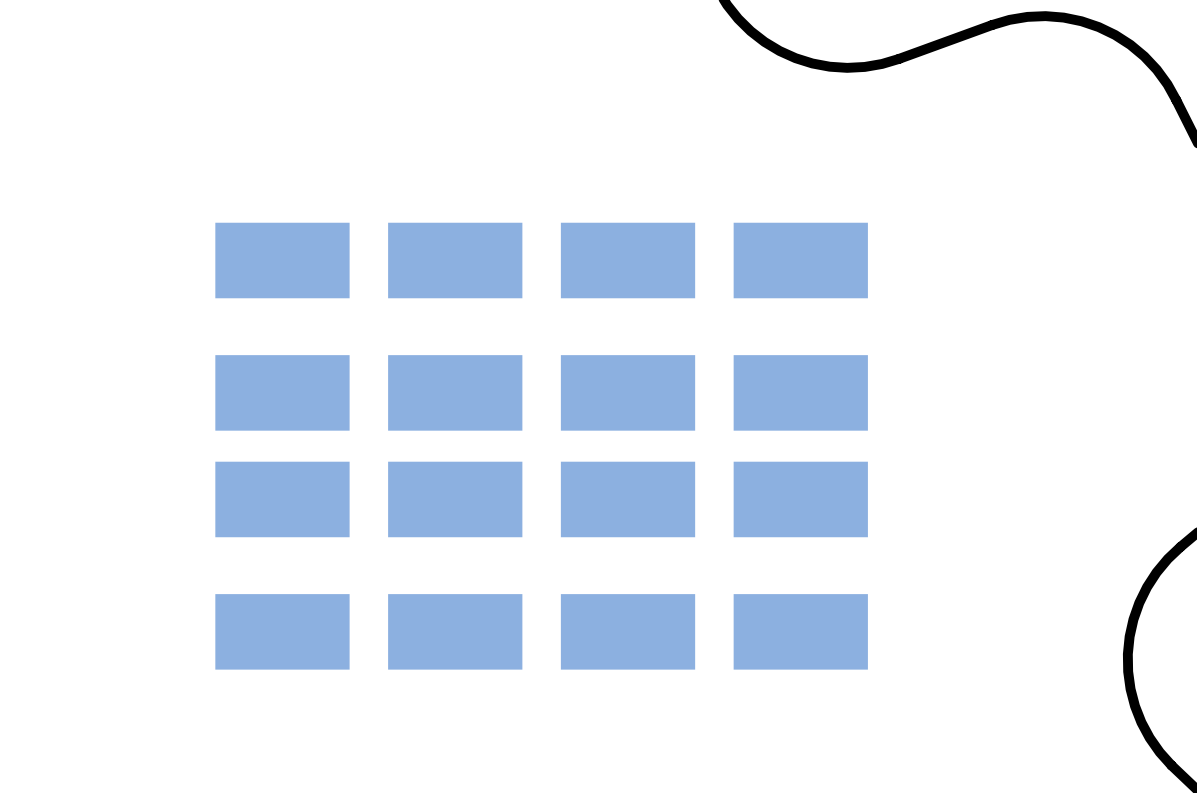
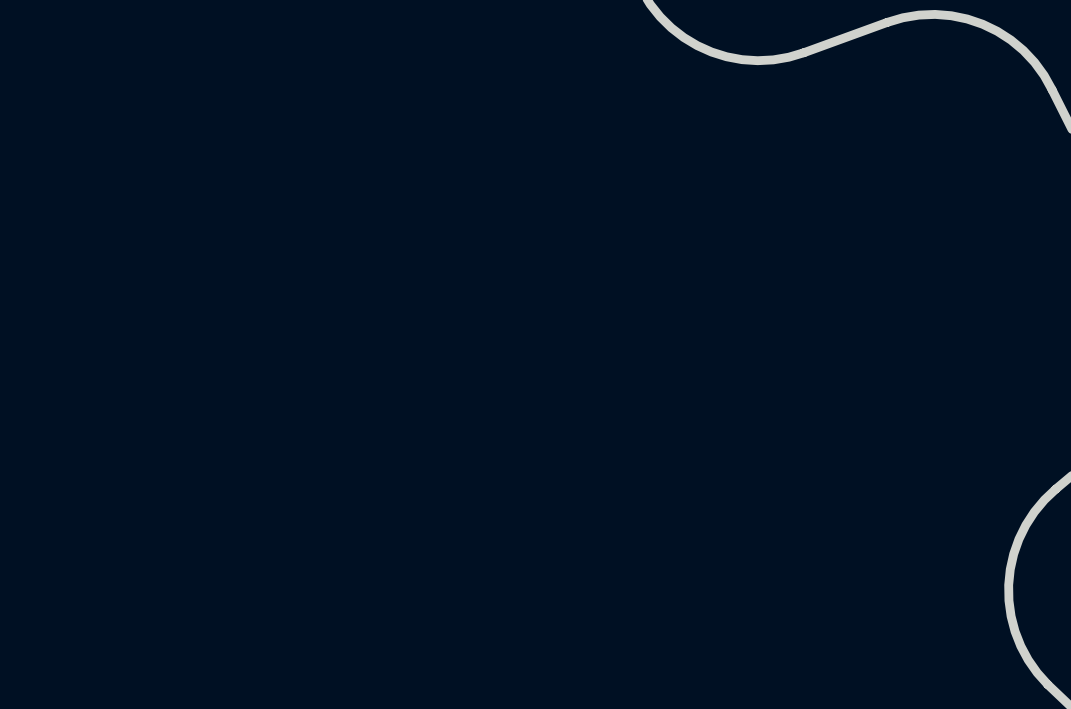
part: (282, 326) -> none
part: (455, 326) -> none
part: (628, 326) -> none
part: (800, 326) -> none
part: (282, 565) -> none
part: (455, 565) -> none
part: (628, 565) -> none
part: (800, 565) -> none

